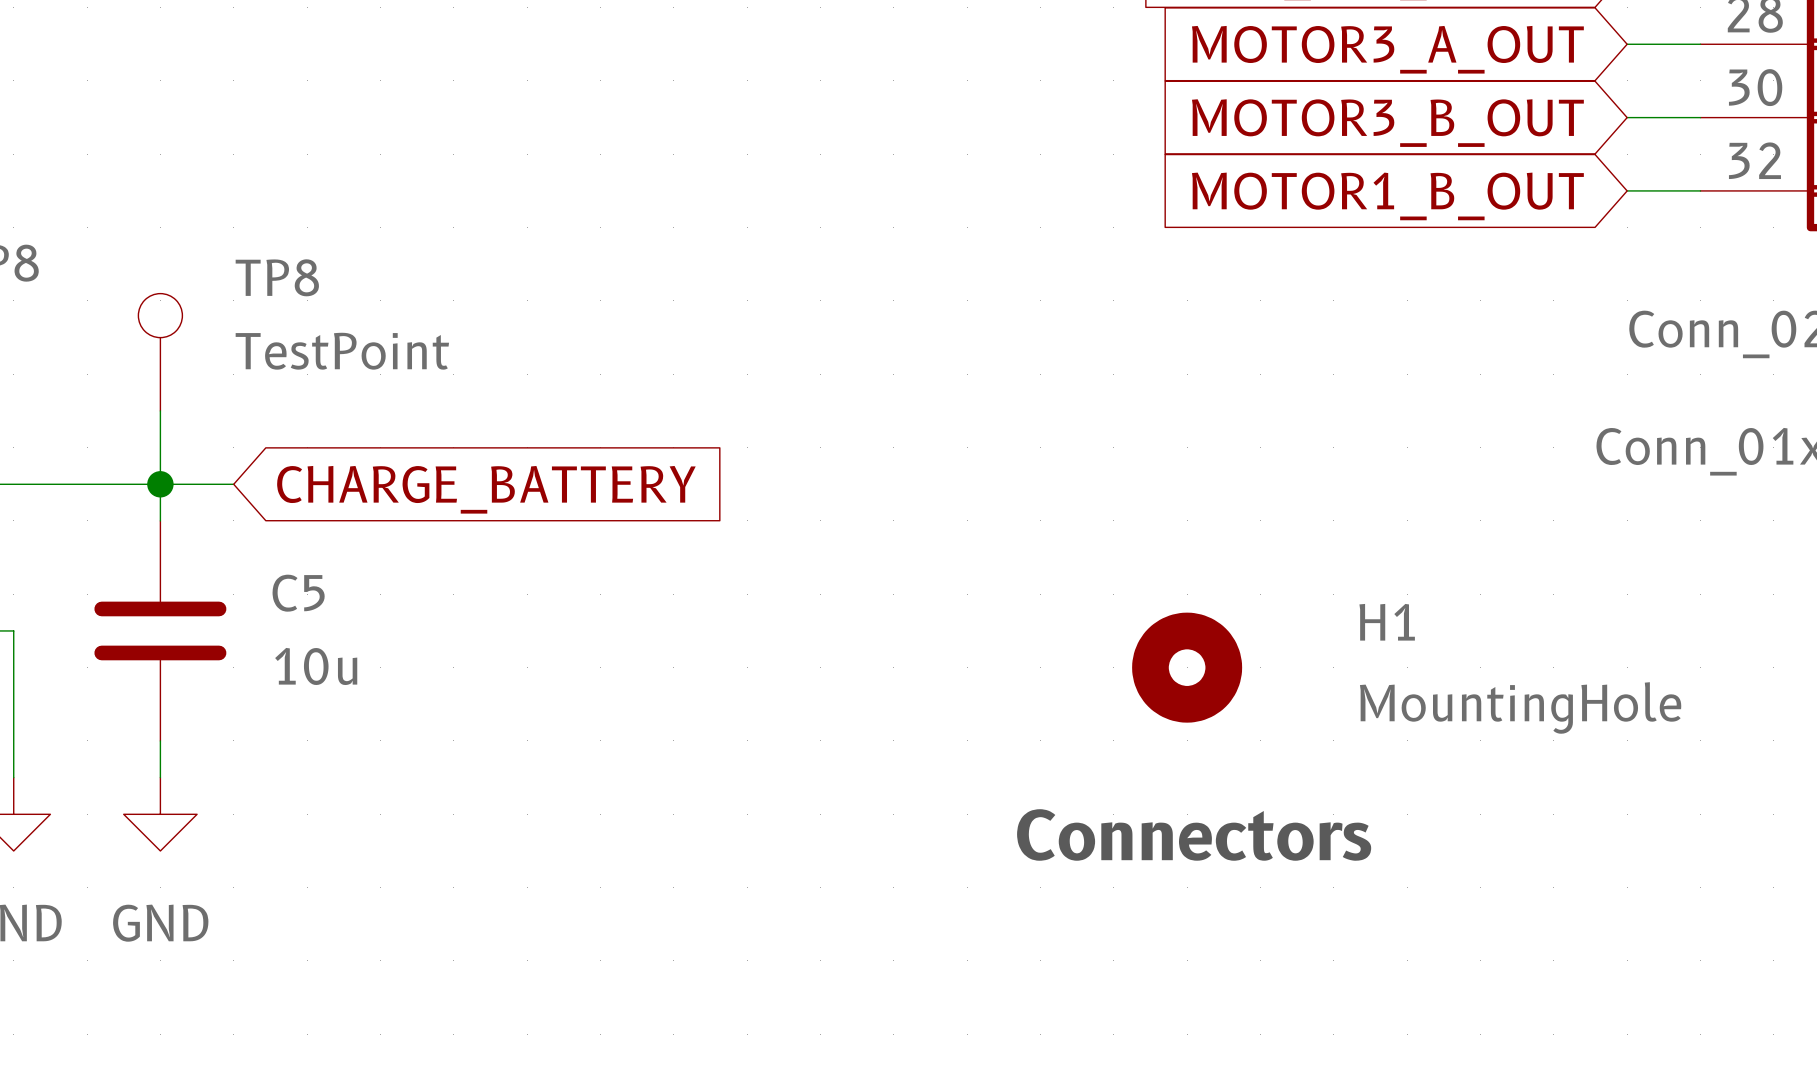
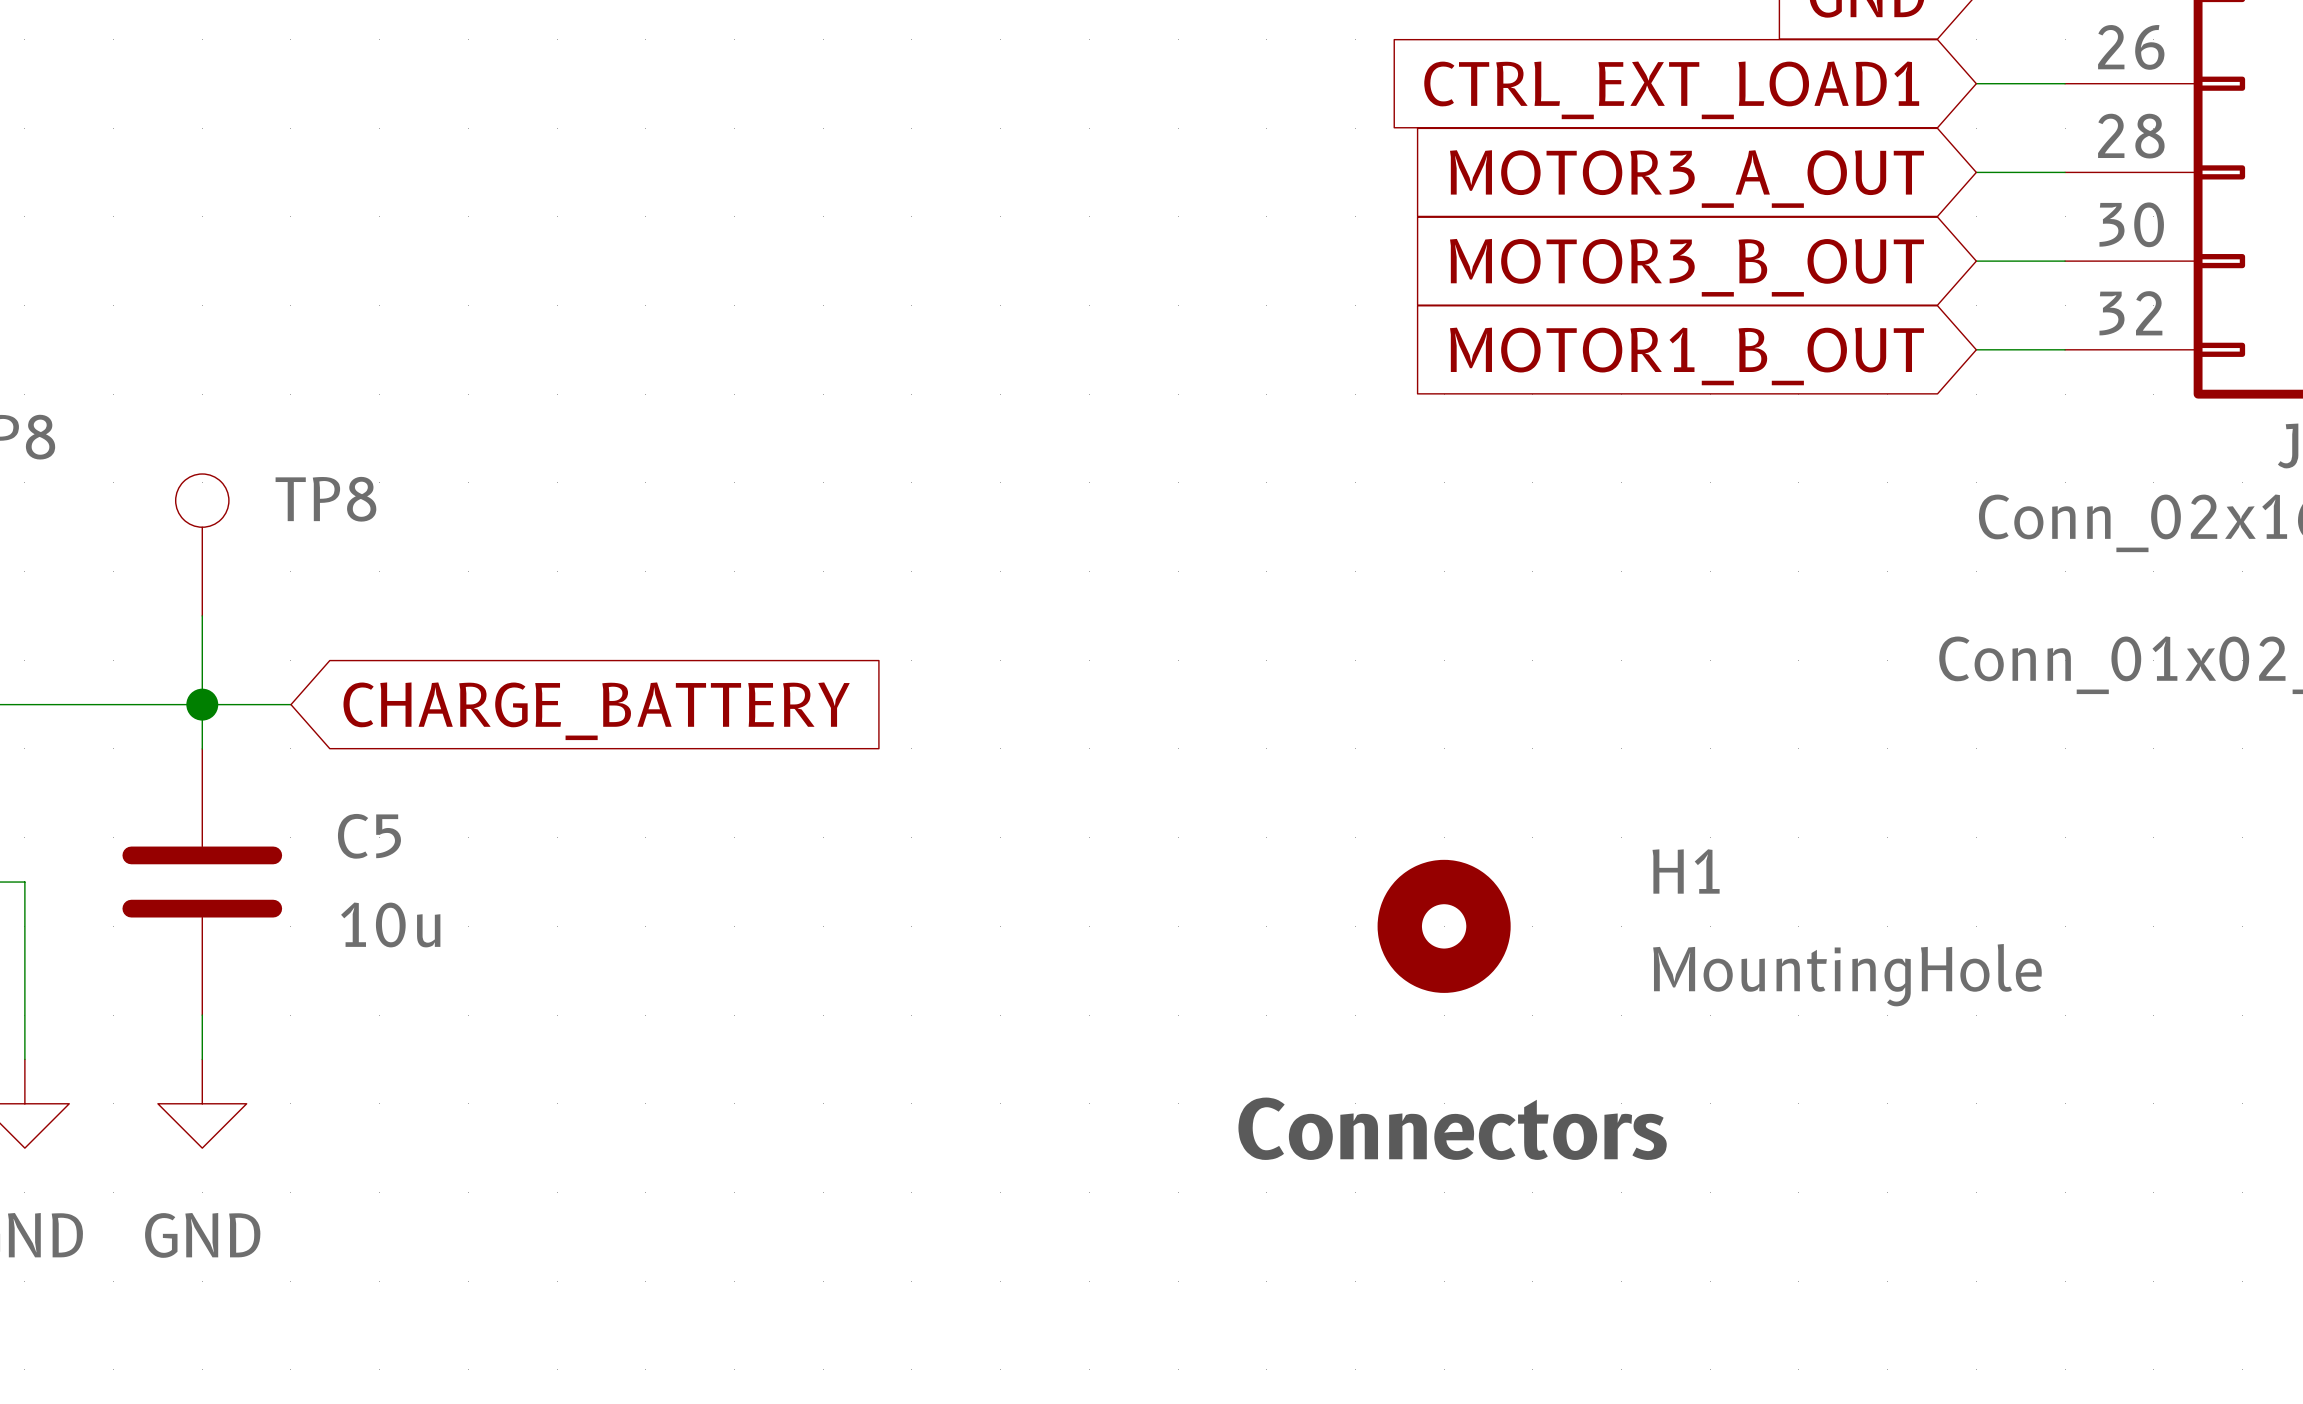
TP8 name position: TP8 (277, 277) -> TP8 (325, 499)
TP8 value: TestPoint (342, 351) -> none

